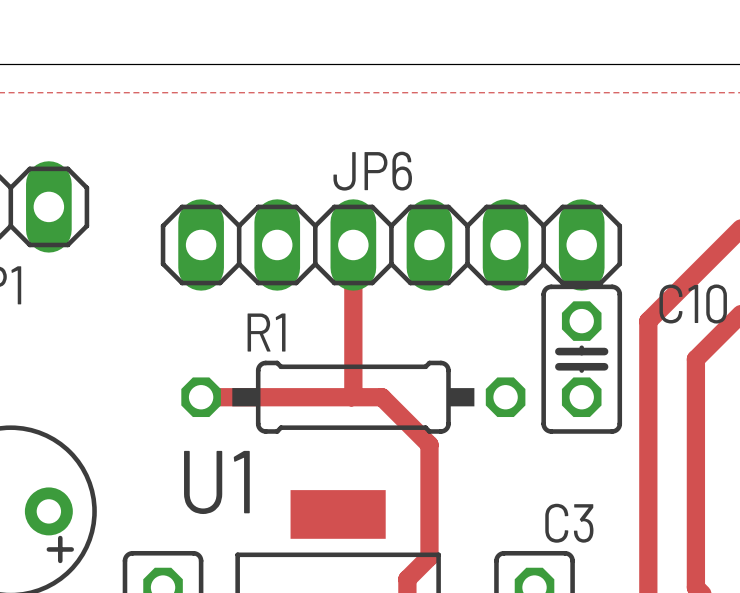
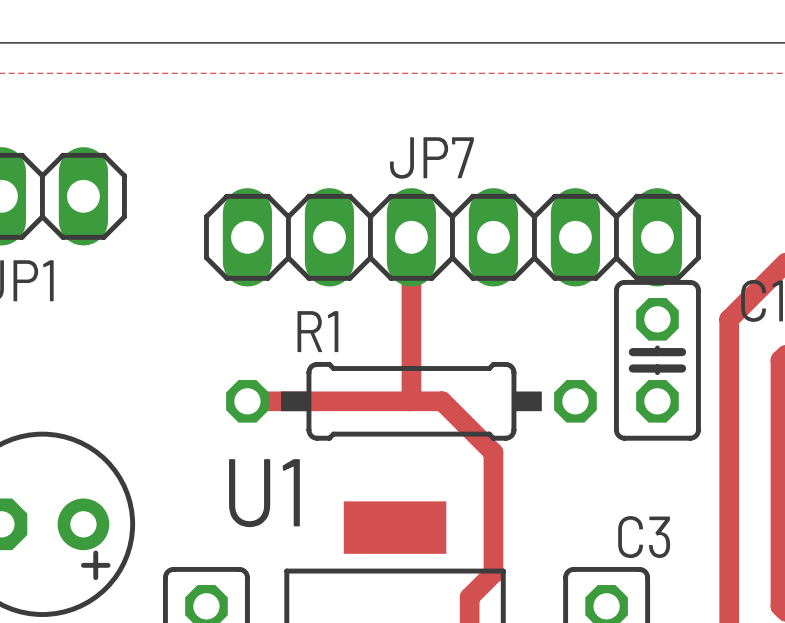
JP6 name: JP6 (372, 171) -> JP7 (431, 157)

